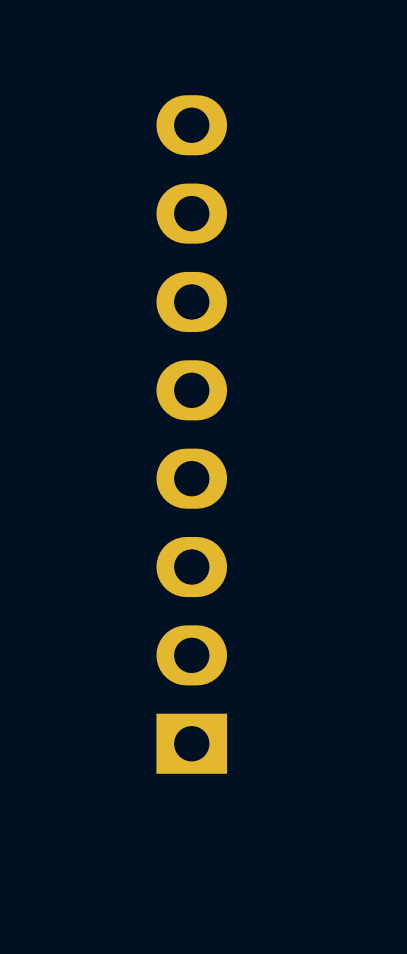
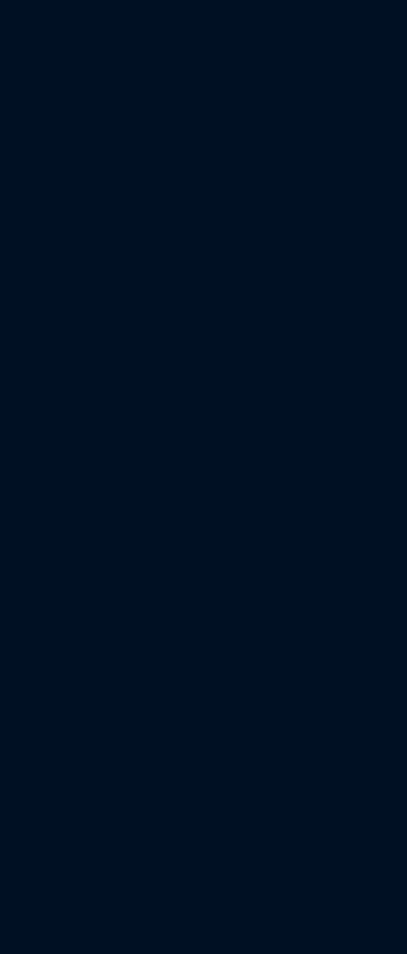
part: (191, 434) -> none

